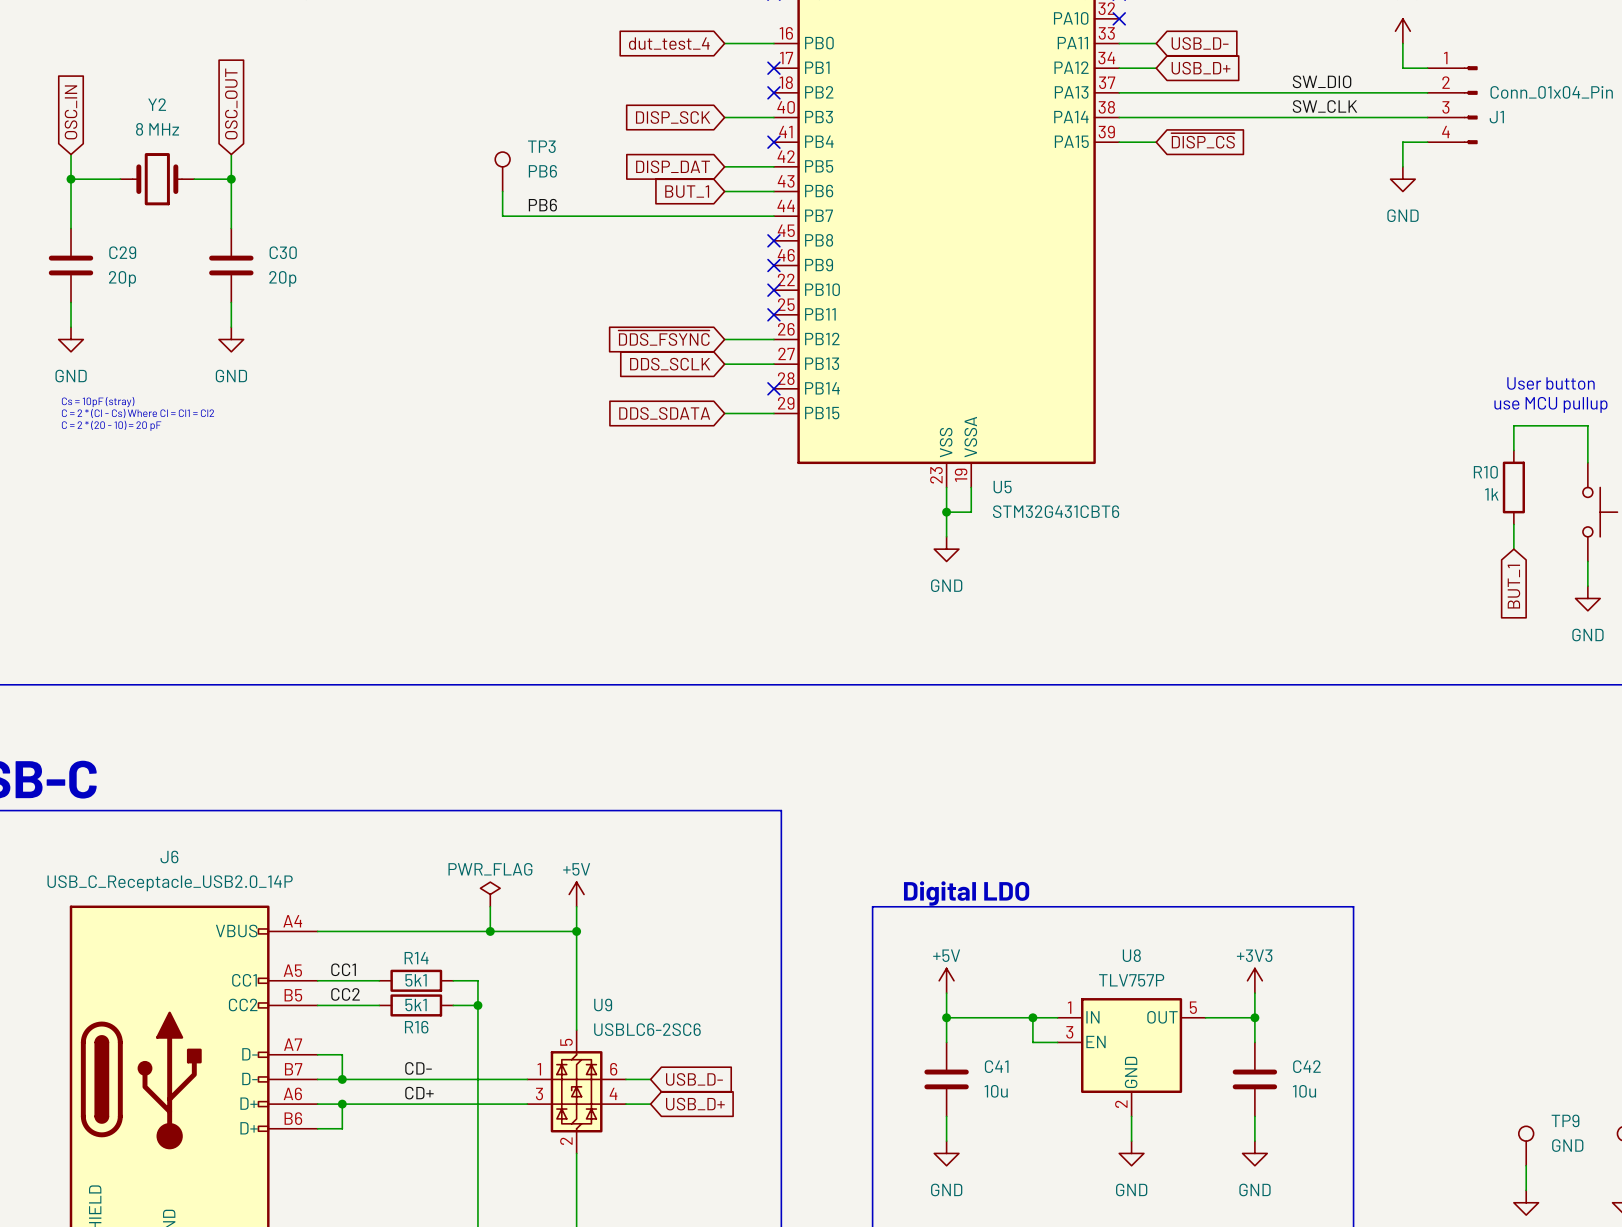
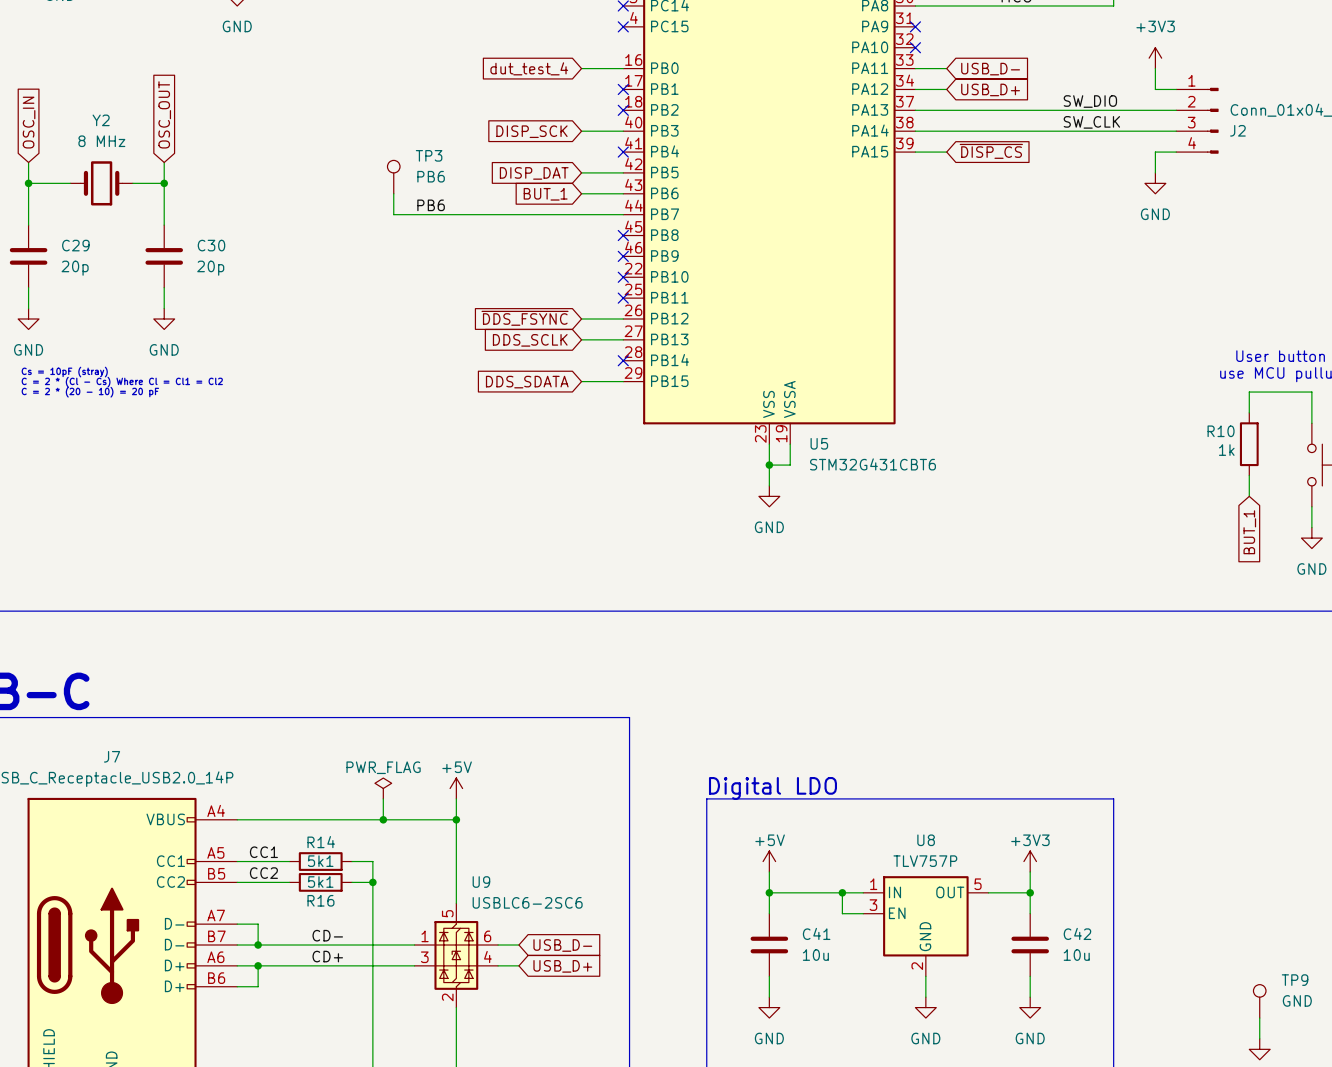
J1 name: J1 (1496, 117) -> J2 (1237, 130)
J6 name: J6 (169, 856) -> J7 (112, 756)

